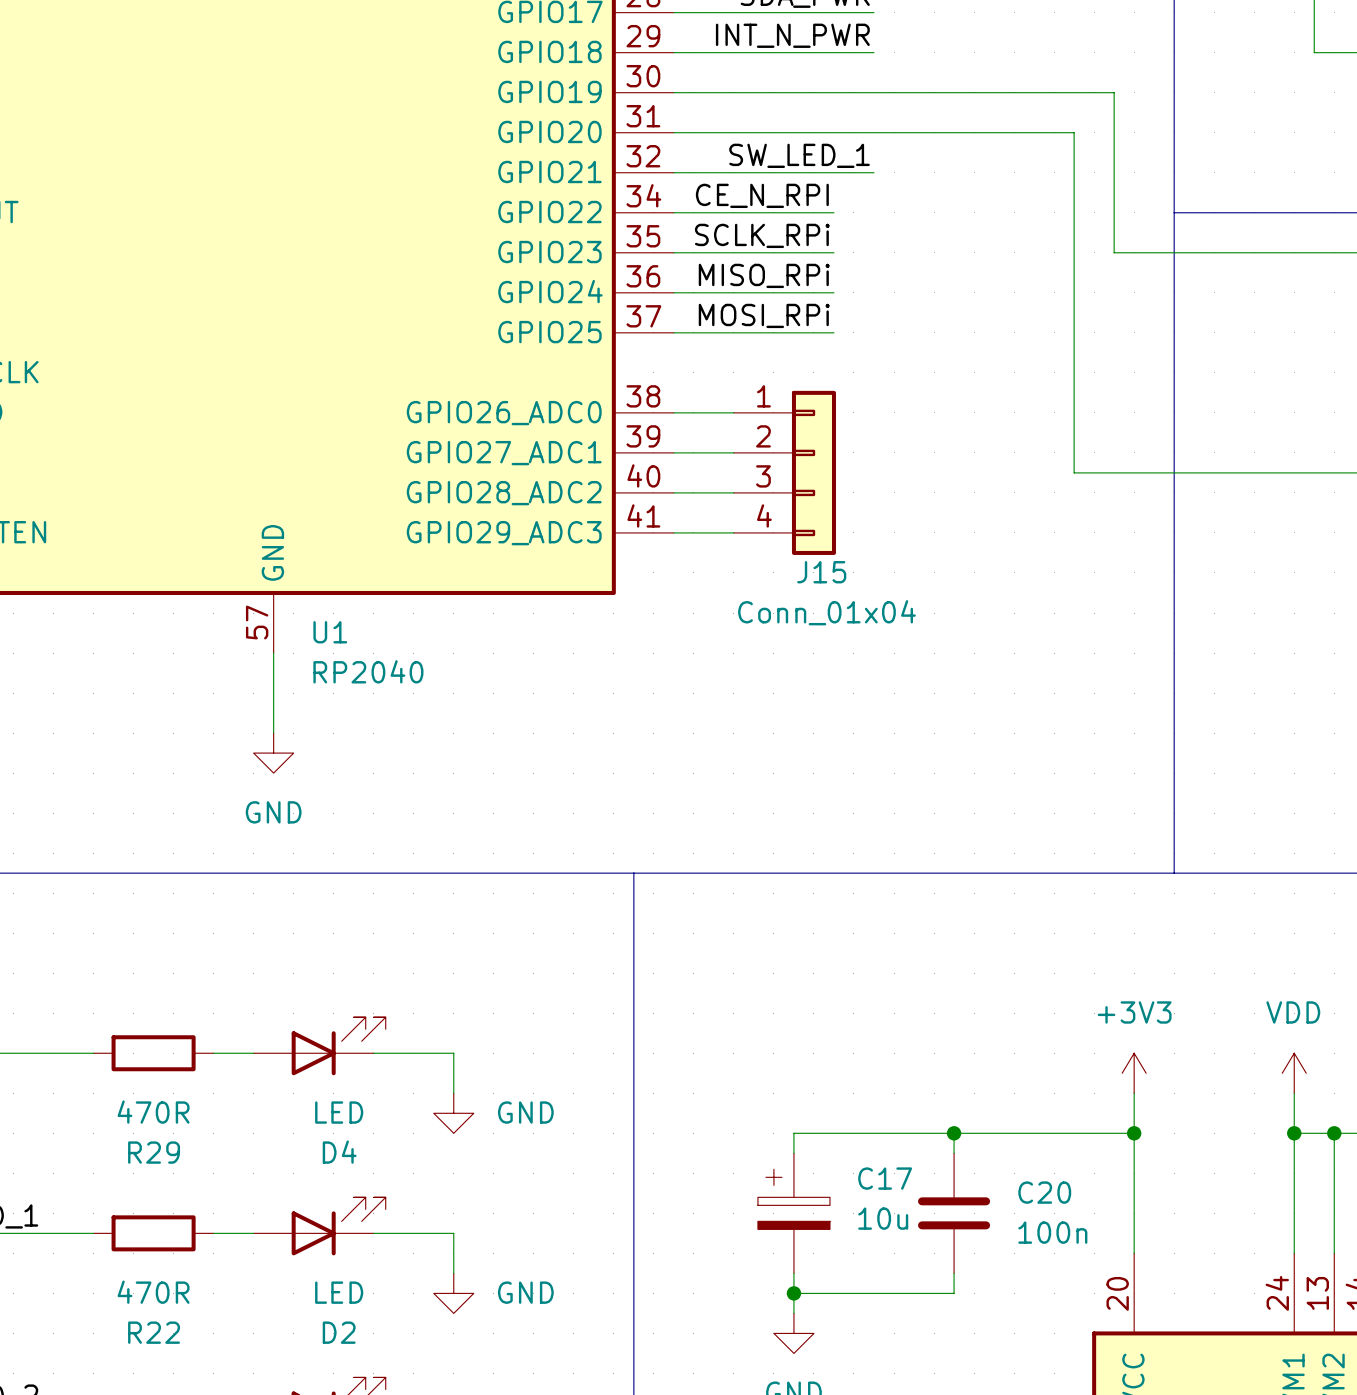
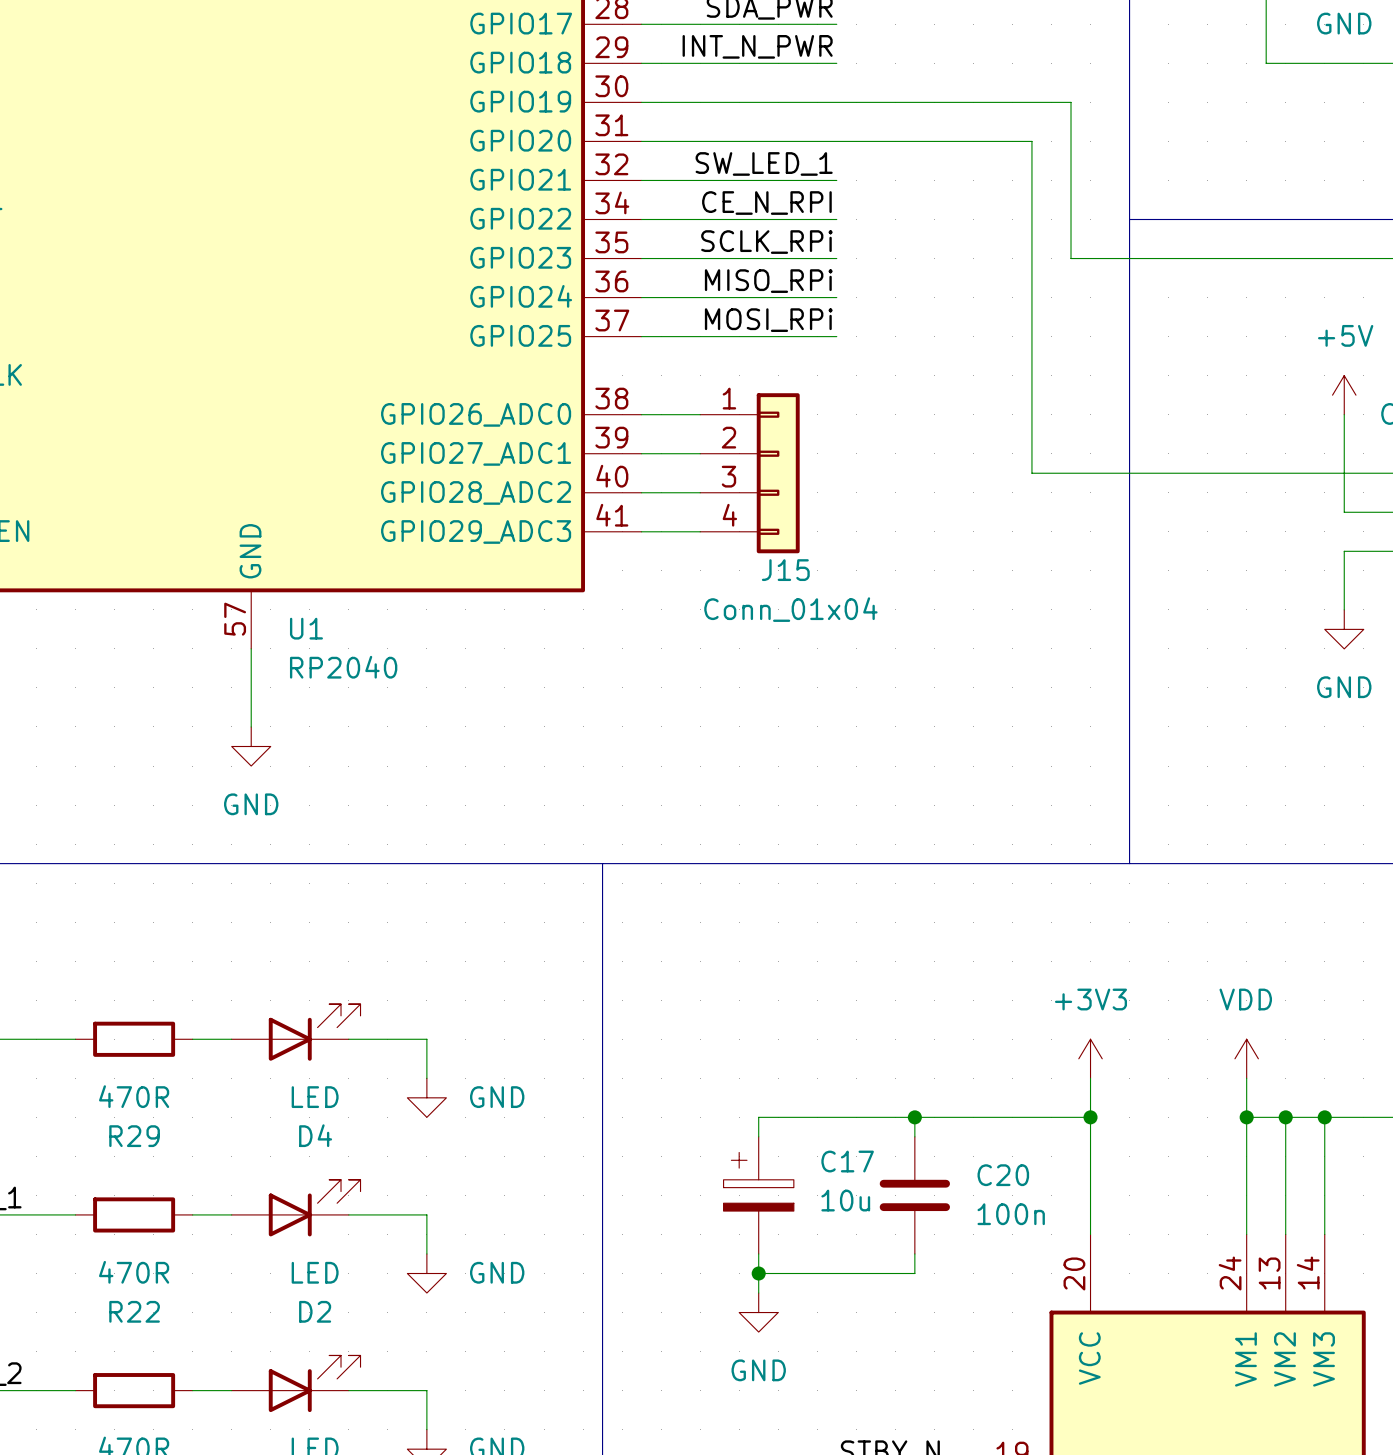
label position: CE_N_RPI (762, 195) -> CE_N_RPI (766, 203)
wire: none -> (797, 219) (836, 219)
label position: SCLK_RPi (762, 235) -> SCLK_RPi (766, 242)
wire: none -> (797, 258) (836, 258)
label position: MISO_RPi (764, 275) -> MISO_RPi (768, 281)
wire: none -> (797, 297) (836, 297)
label position: MOSI_RPi (764, 315) -> MOSI_RPi (768, 320)
wire: none -> (797, 336) (836, 336)

